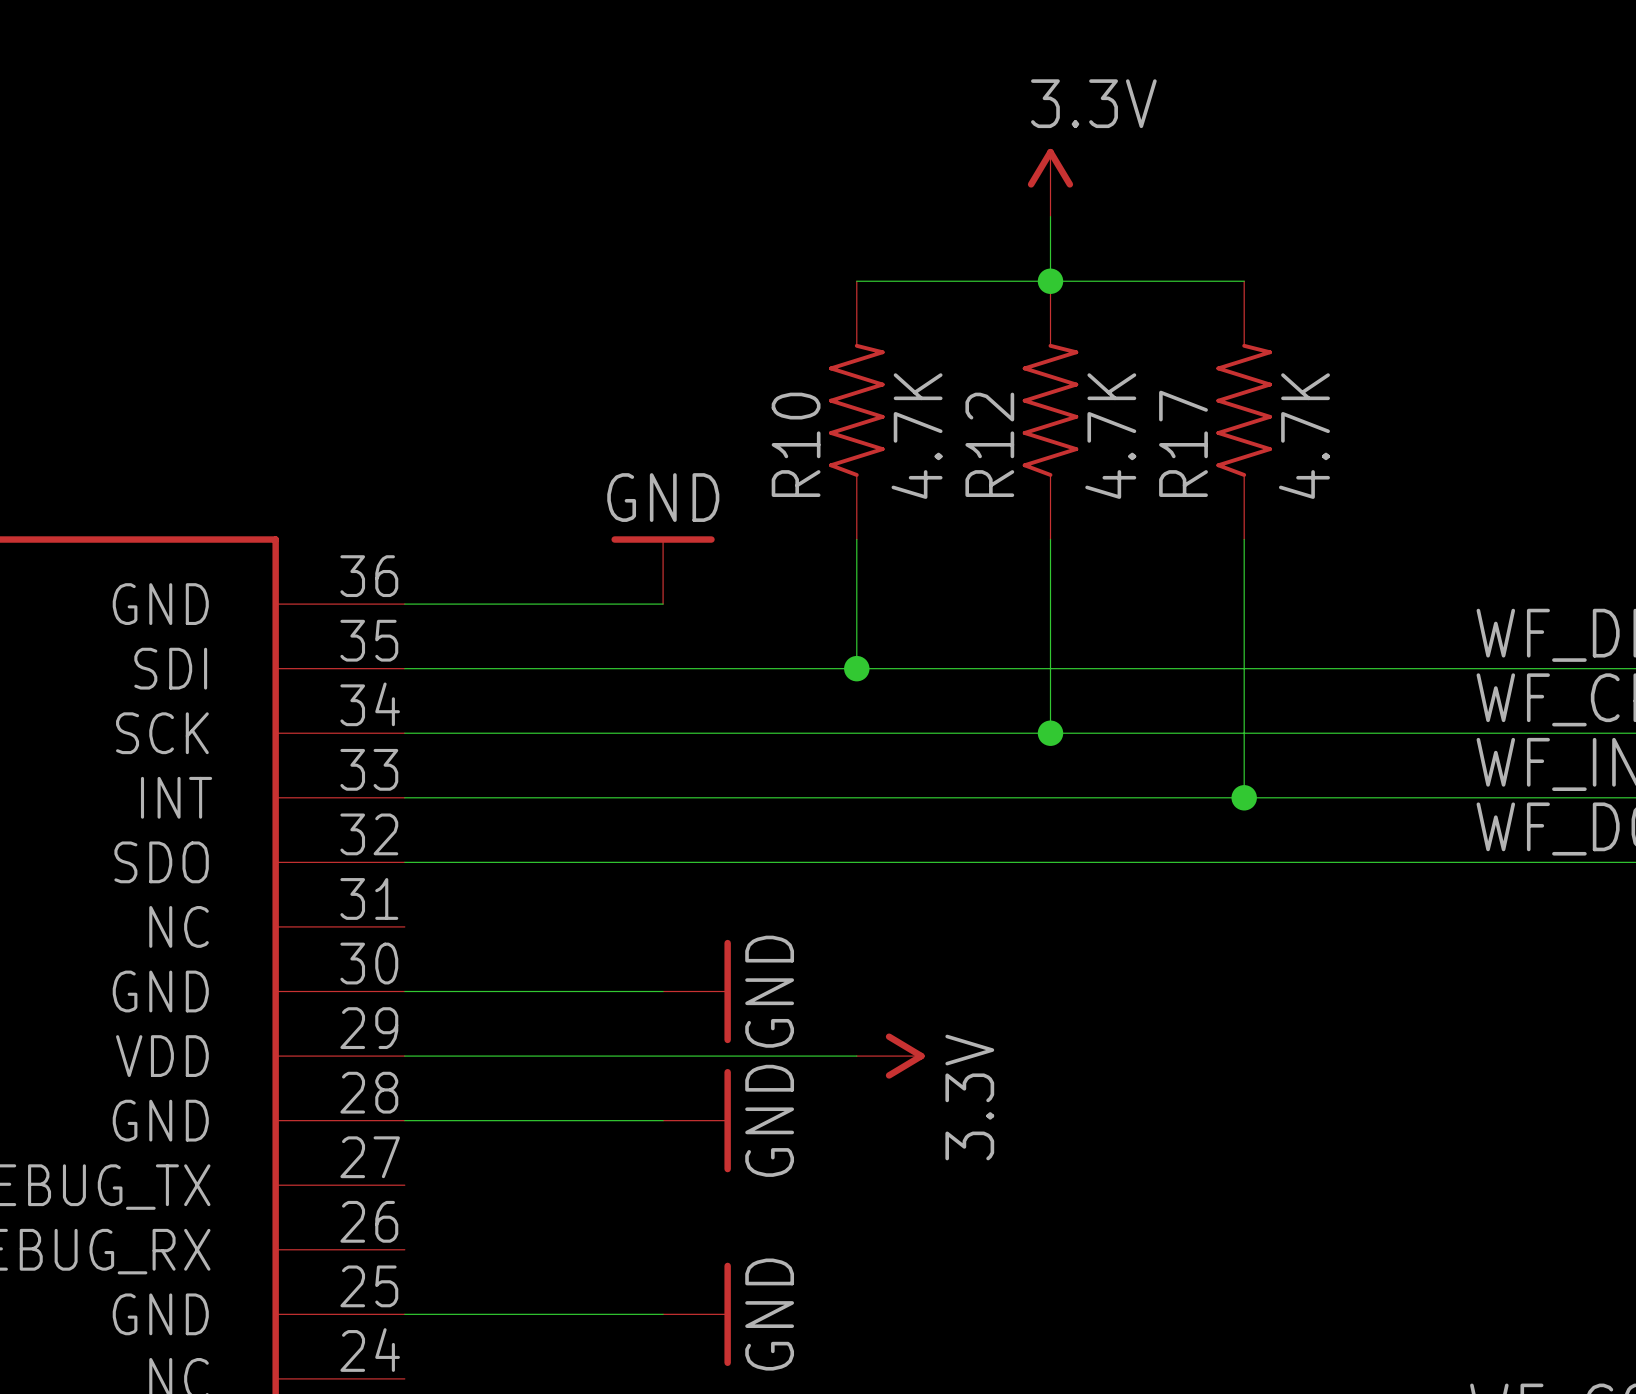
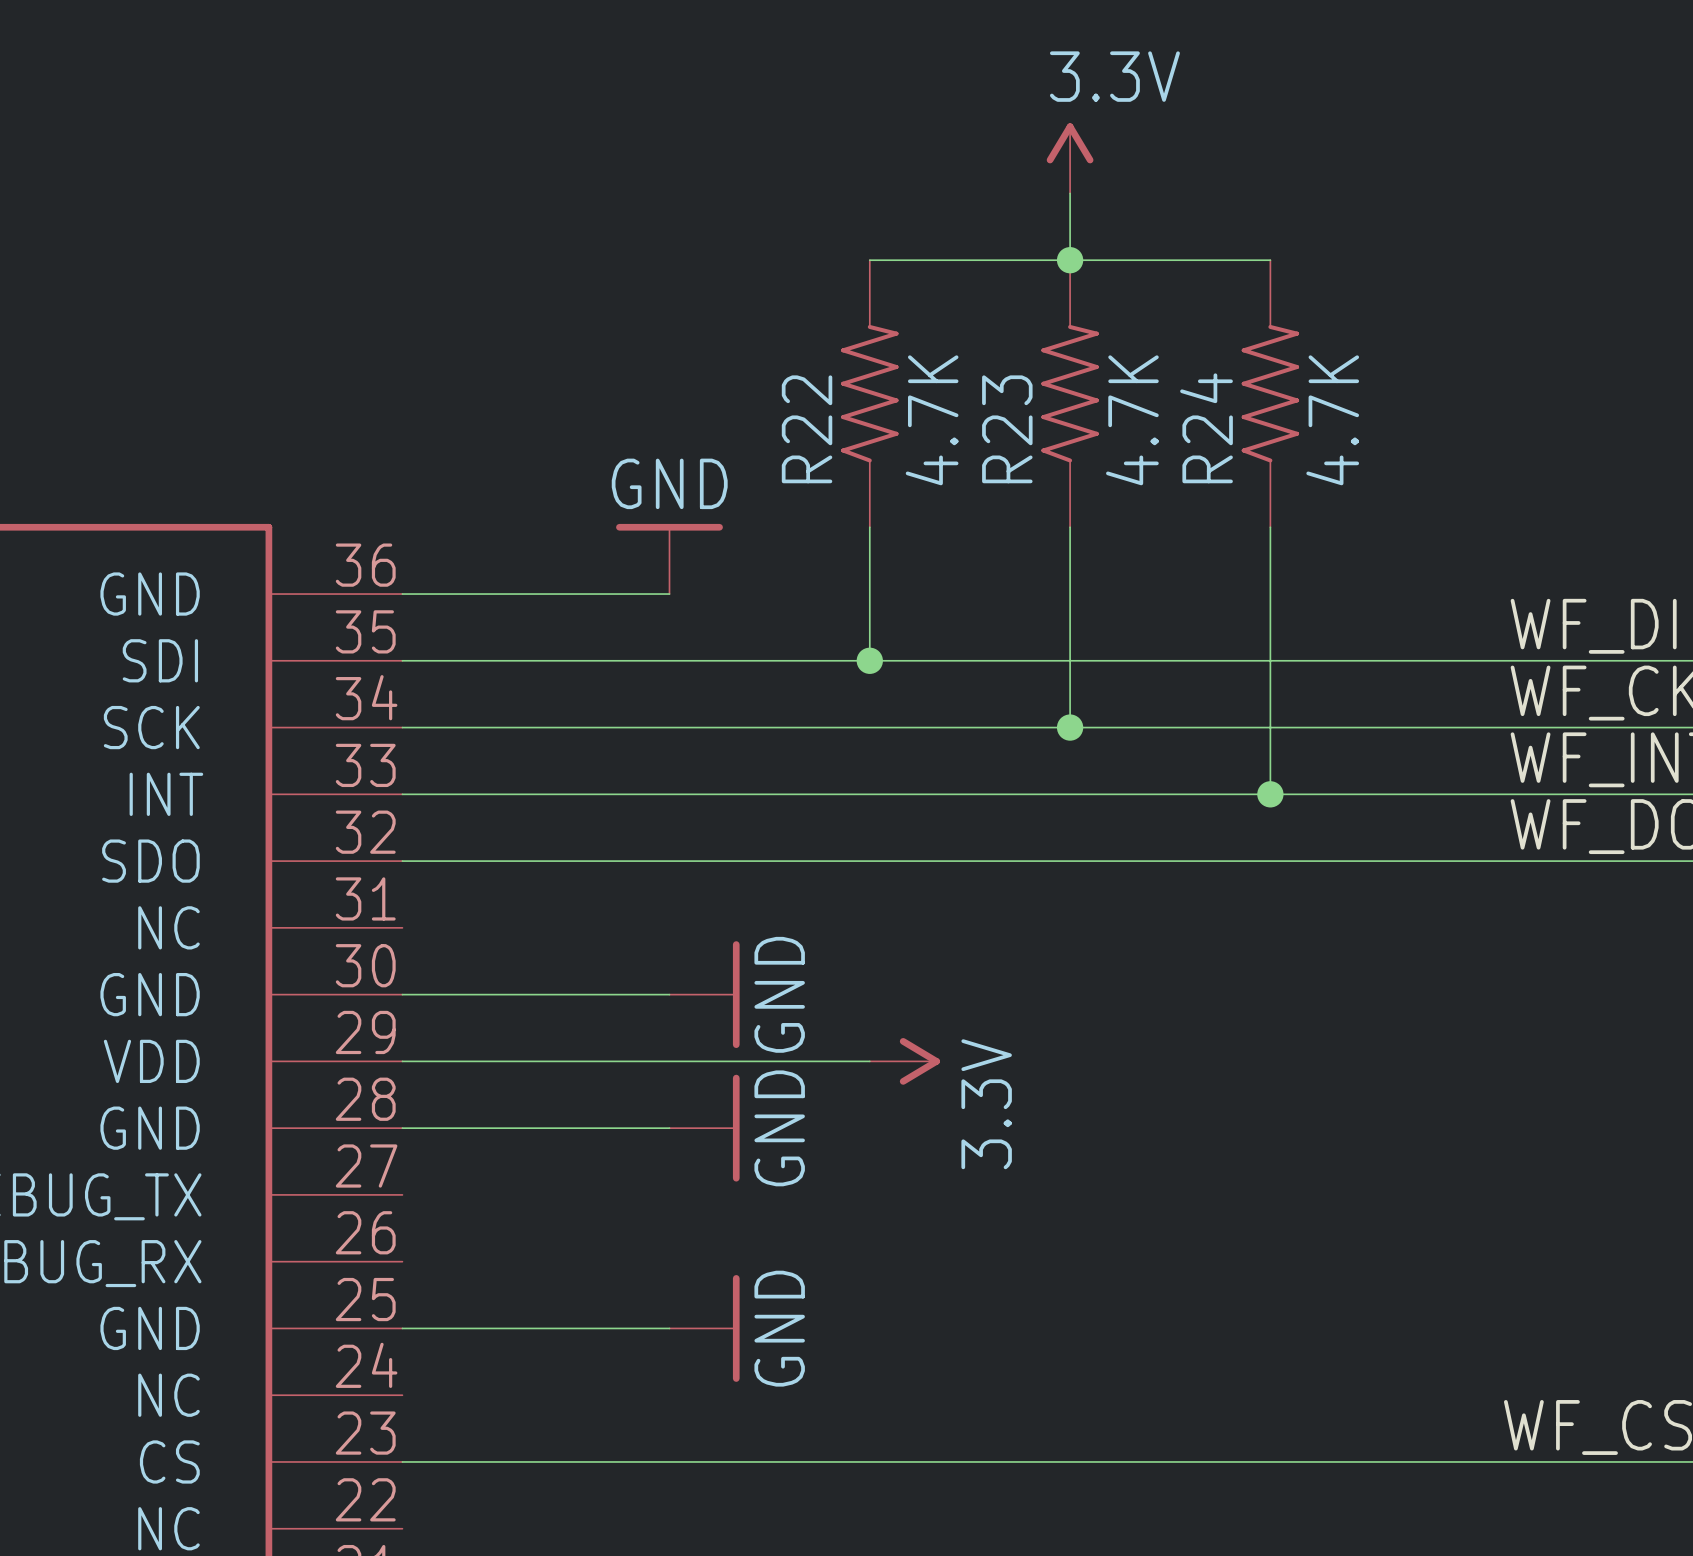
R17 name: R17 (1183, 443) -> R24 (1206, 428)
R10 name: R10 (796, 444) -> R22 (807, 429)
R12 name: R12 (989, 444) -> R23 (1007, 429)

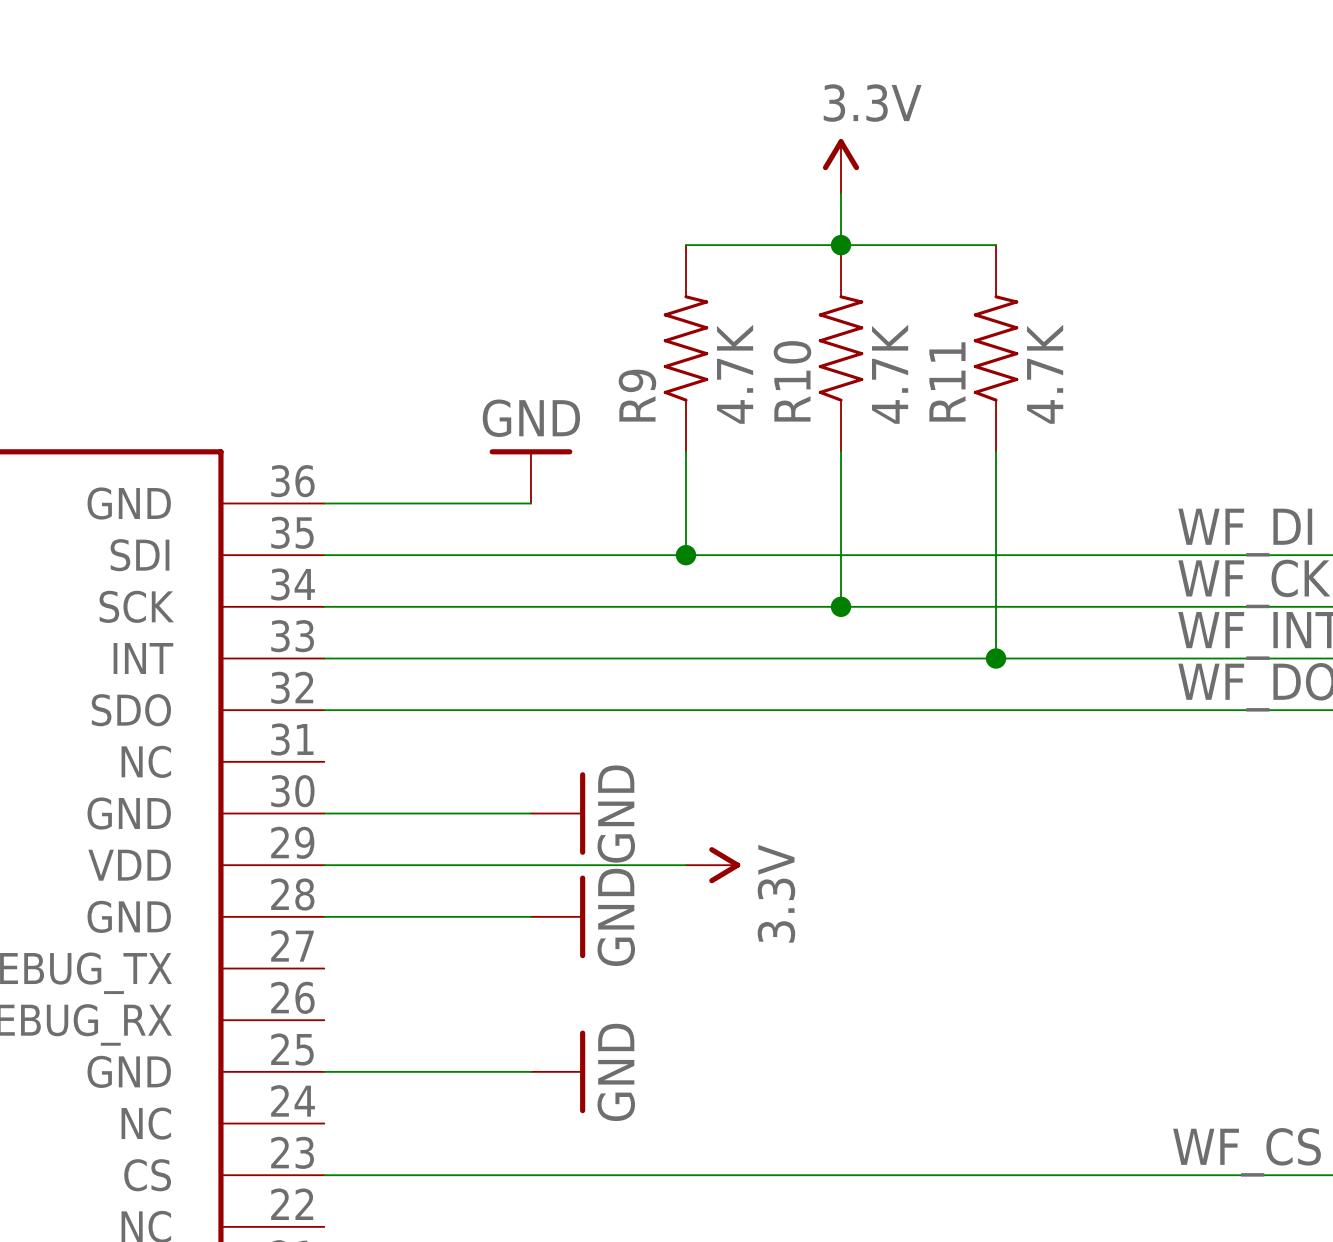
R24 name: R24 (1206, 428) -> R11 (947, 381)
R22 name: R22 (807, 429) -> R9 (637, 395)
R23 name: R23 (1007, 429) -> R10 (792, 381)

